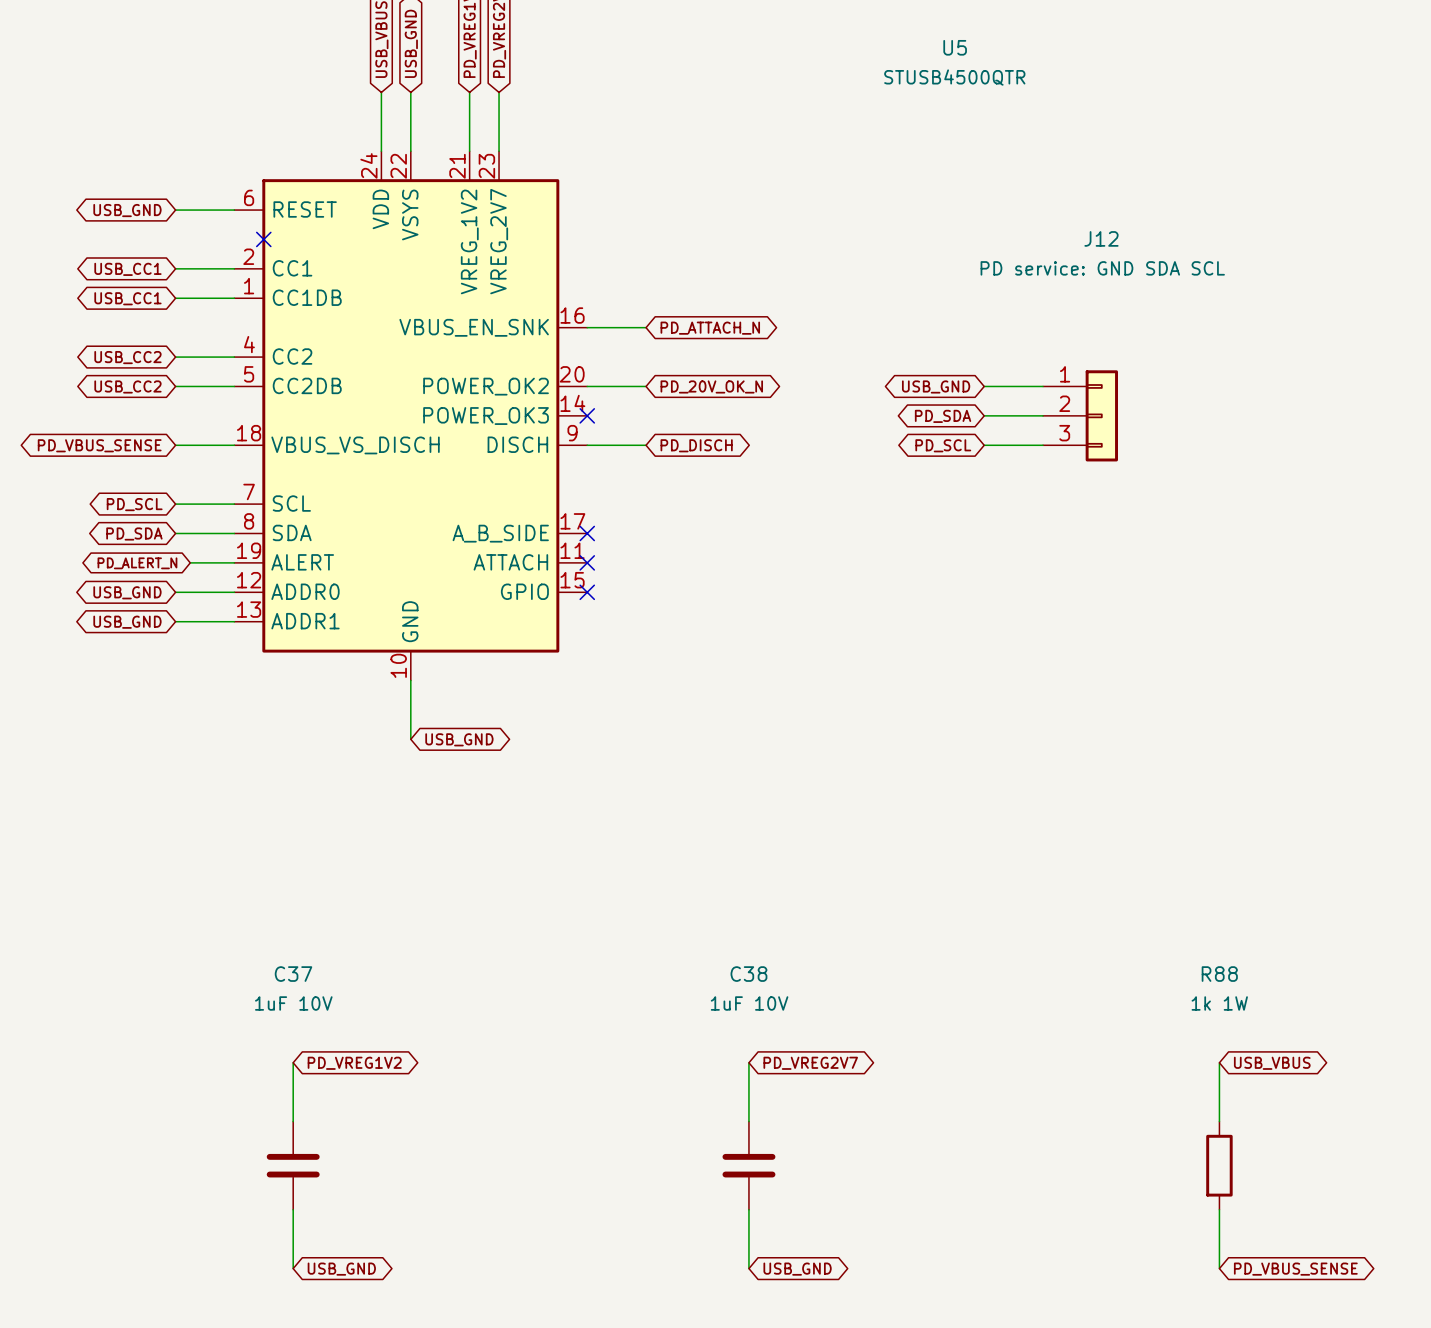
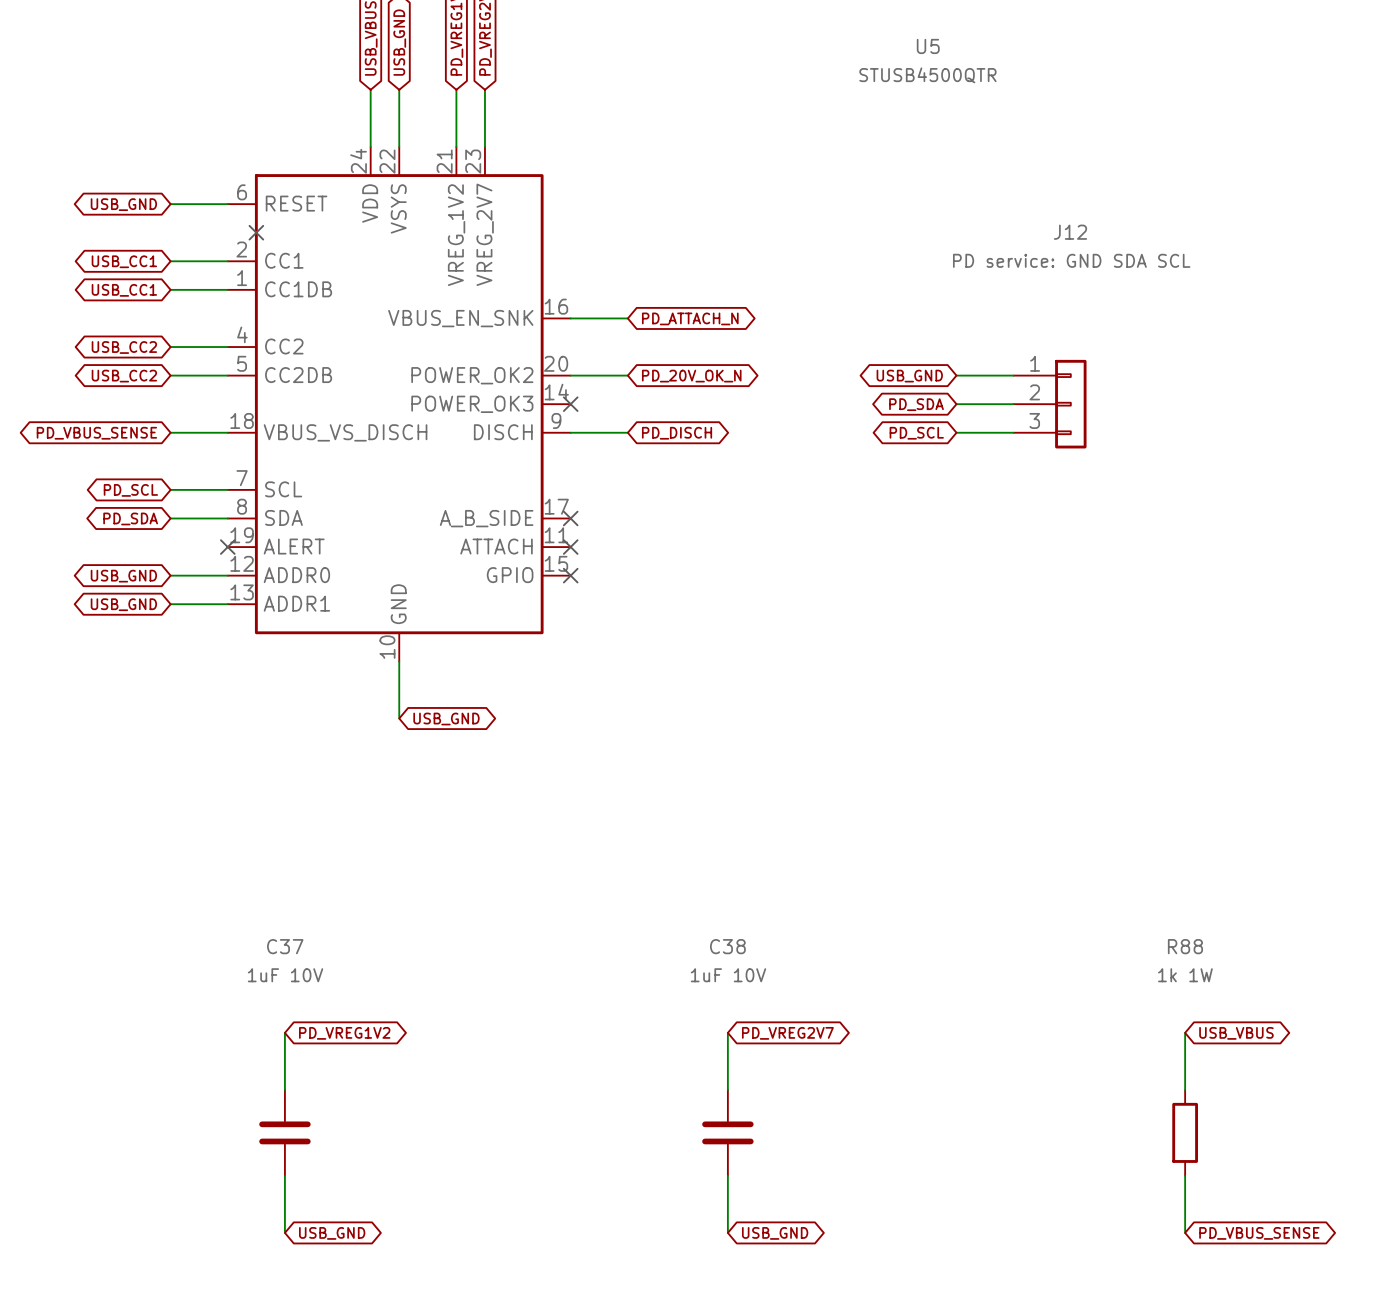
wire: (190, 562) (234, 562) -> none
no-connect mark: none -> (227, 547)
global label: PD_ALERT_N (137, 563) -> none

